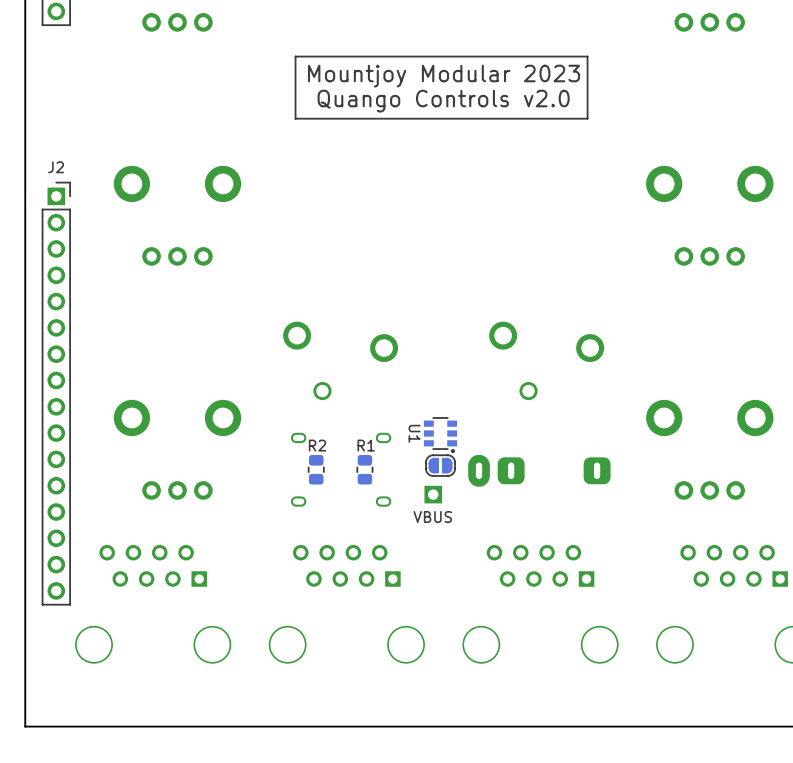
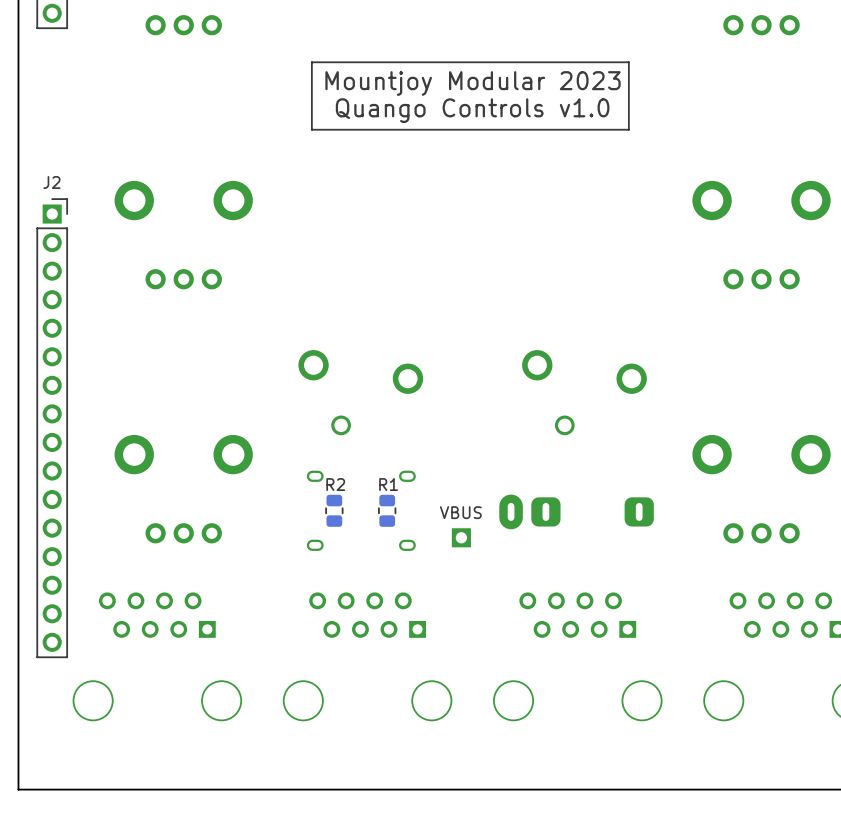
text: Quango Controls v2.0 (443, 101) -> Quango Controls v1.0 (472, 110)
U1: (440, 435) -> none
part: (440, 465) -> none
text position: VBUS (432, 517) -> VBUS (460, 512)

